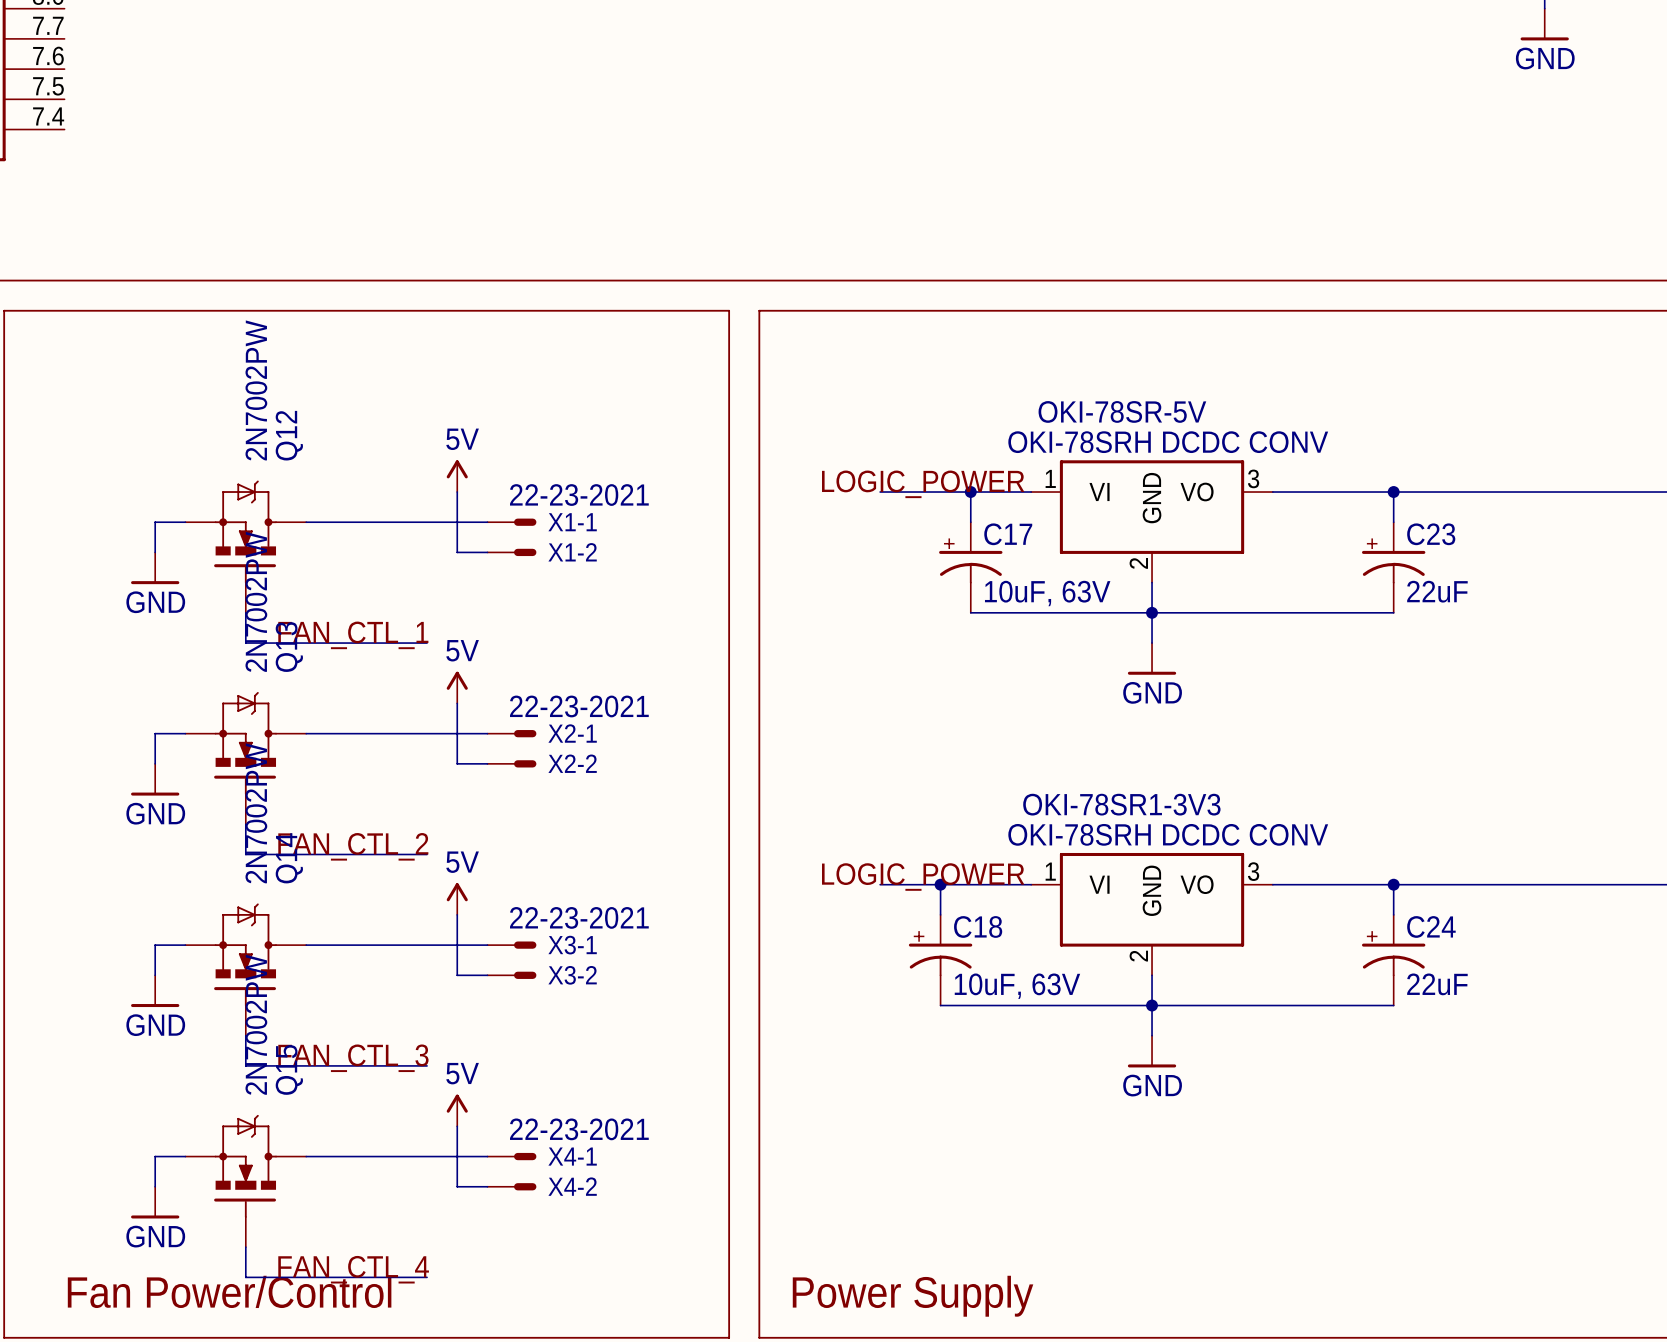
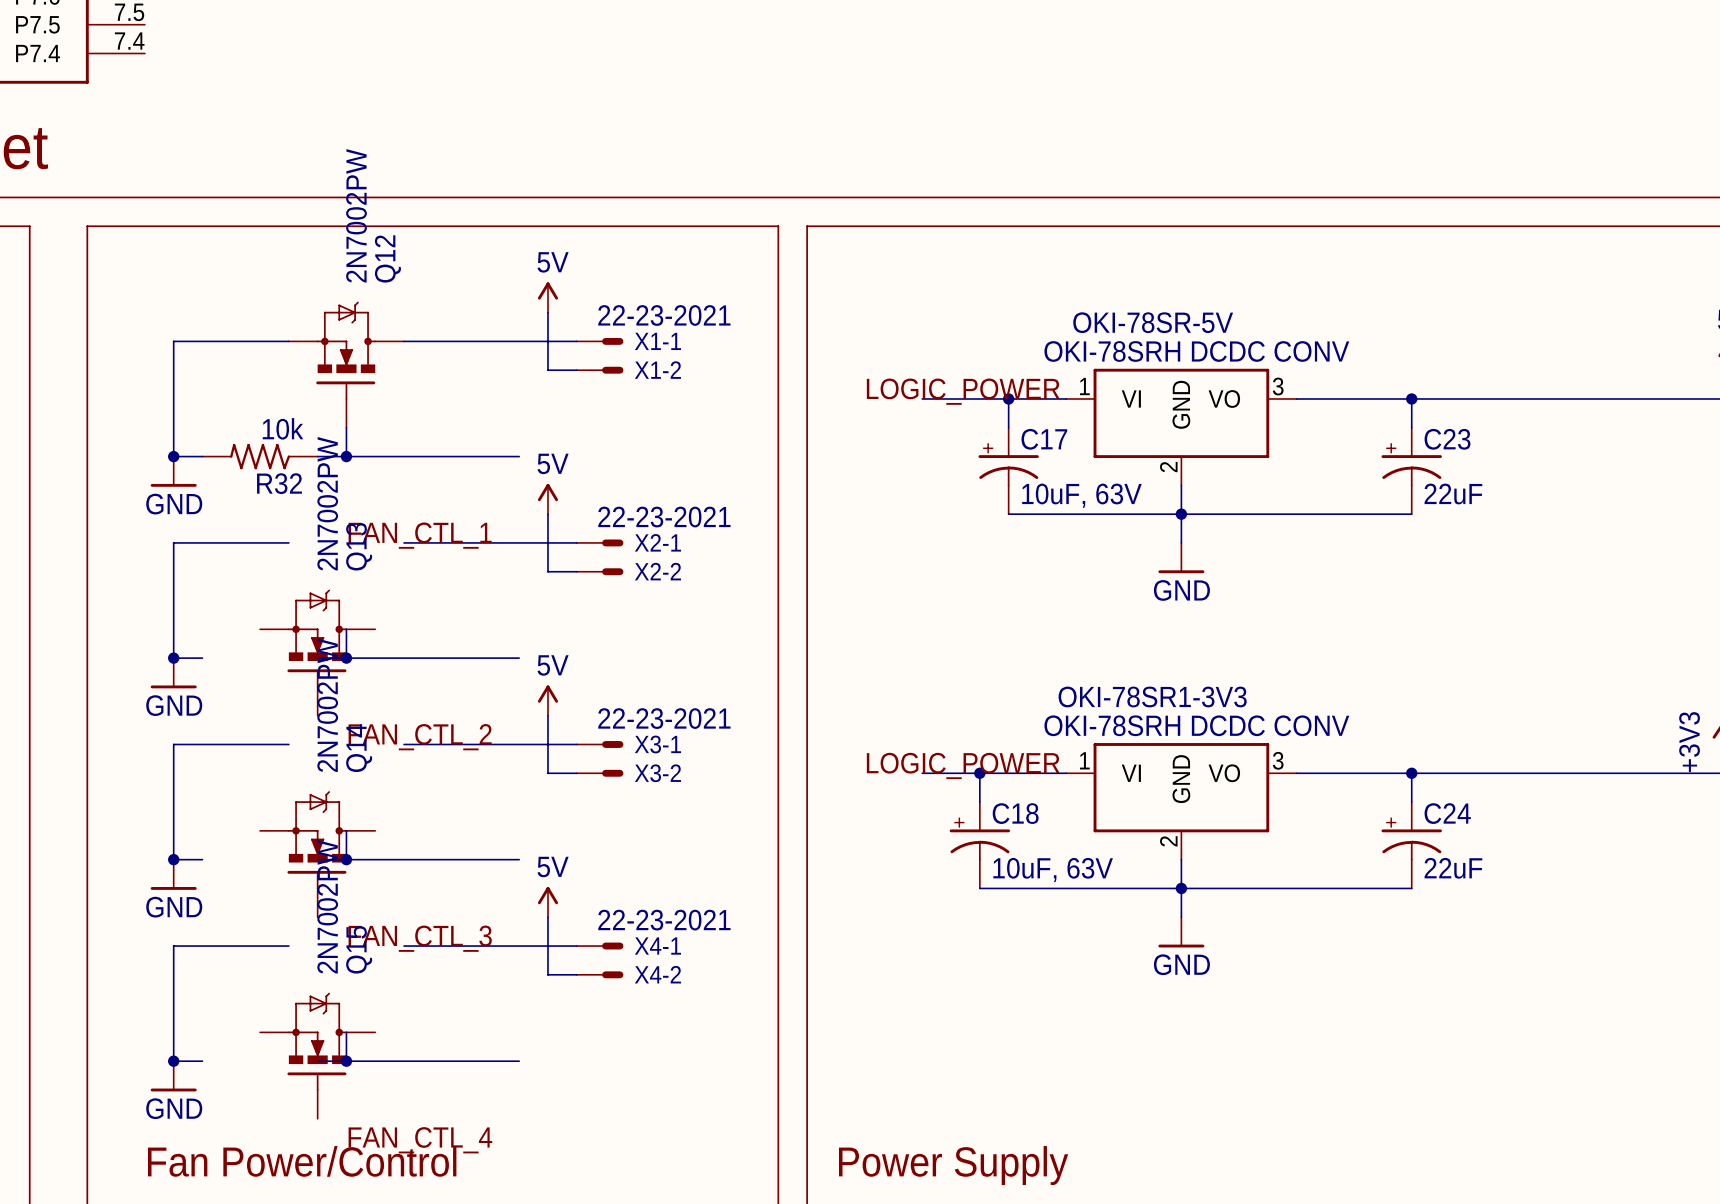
power symbol: none -> 5V (547, 297)
wire: none -> (288, 341) (173, 341) (173, 456) (202, 456)
power symbol: 5V (457, 476) -> none
wire: (457, 492) (457, 552) (487, 552) -> (547, 312) (547, 370) (576, 370)
wire: (185, 522) (155, 522) (155, 552) -> none
wire: none -> (346, 427) (346, 456)
wire: (306, 522) (487, 522) -> (404, 341) (576, 341)
X1-1 position: (511, 522) -> (600, 341)
Q12 position: (245, 546) -> (346, 364)
junction: none -> (173, 456)
R32: none -> 10k (260, 456)
wire: none -> (317, 456) (519, 456)
junction: none -> (346, 456)
X1-2 position: (511, 552) -> (600, 370)
power symbol position: GND (155, 568) -> GND (173, 471)
power symbol: none -> 5V (547, 499)
wire: (245, 612) (245, 643) (336, 643) -> none
wire: none -> (288, 542) (173, 542) (173, 658) (202, 658)
wire: none -> (490, 542) (576, 542)
power symbol: 5V (457, 687) -> none
wire: (457, 703) (457, 763) (487, 763) -> (547, 514) (547, 571) (576, 571)
wire: (185, 733) (155, 733) (155, 763) -> none
wire: none -> (346, 629) (346, 658)
wire: (306, 733) (487, 733) -> none
X2-1 position: (511, 733) -> (600, 542)
junction: none -> (173, 658)
wire: none -> (317, 658) (519, 658)
junction: none -> (346, 658)
X2-2 position: (511, 763) -> (600, 571)
power symbol position: GND (155, 779) -> GND (173, 673)
power symbol: none -> 5V (547, 700)
wire: (245, 824) (245, 854) (336, 854) -> none
wire: none -> (288, 744) (173, 744) (173, 859) (202, 859)
wire: none -> (490, 744) (576, 744)
power symbol: 5V (457, 899) -> none
wire: (457, 914) (457, 975) (487, 975) -> (547, 715) (547, 773) (576, 773)
wire: (185, 945) (155, 945) (155, 975) -> none
wire: none -> (346, 830) (346, 859)
wire: (306, 945) (487, 945) -> none
X3-1 position: (511, 945) -> (600, 744)
junction: none -> (173, 859)
wire: none -> (317, 859) (519, 859)
junction: none -> (346, 859)
X3-2 position: (511, 975) -> (600, 773)
power symbol position: GND (155, 991) -> GND (173, 874)
power symbol: none -> 5V (547, 902)
wire: (245, 1035) (245, 1065) (336, 1065) -> none
wire: none -> (288, 946) (173, 946) (173, 1061) (202, 1061)
wire: none -> (490, 946) (576, 946)
power symbol: 5V (457, 1110) -> none
wire: (457, 1126) (457, 1186) (487, 1186) -> (547, 917) (547, 974) (576, 974)
wire: (185, 1156) (155, 1156) (155, 1186) -> none
wire: none -> (346, 1032) (346, 1061)
wire: (306, 1156) (487, 1156) -> none
X4-1 position: (511, 1156) -> (600, 946)
junction: none -> (173, 1061)
wire: none -> (317, 1061) (519, 1061)
junction: none -> (346, 1061)
X4-2 position: (511, 1186) -> (600, 974)
power symbol position: GND (155, 1202) -> GND (173, 1076)
wire: (245, 1247) (245, 1277) (427, 1277) -> none

